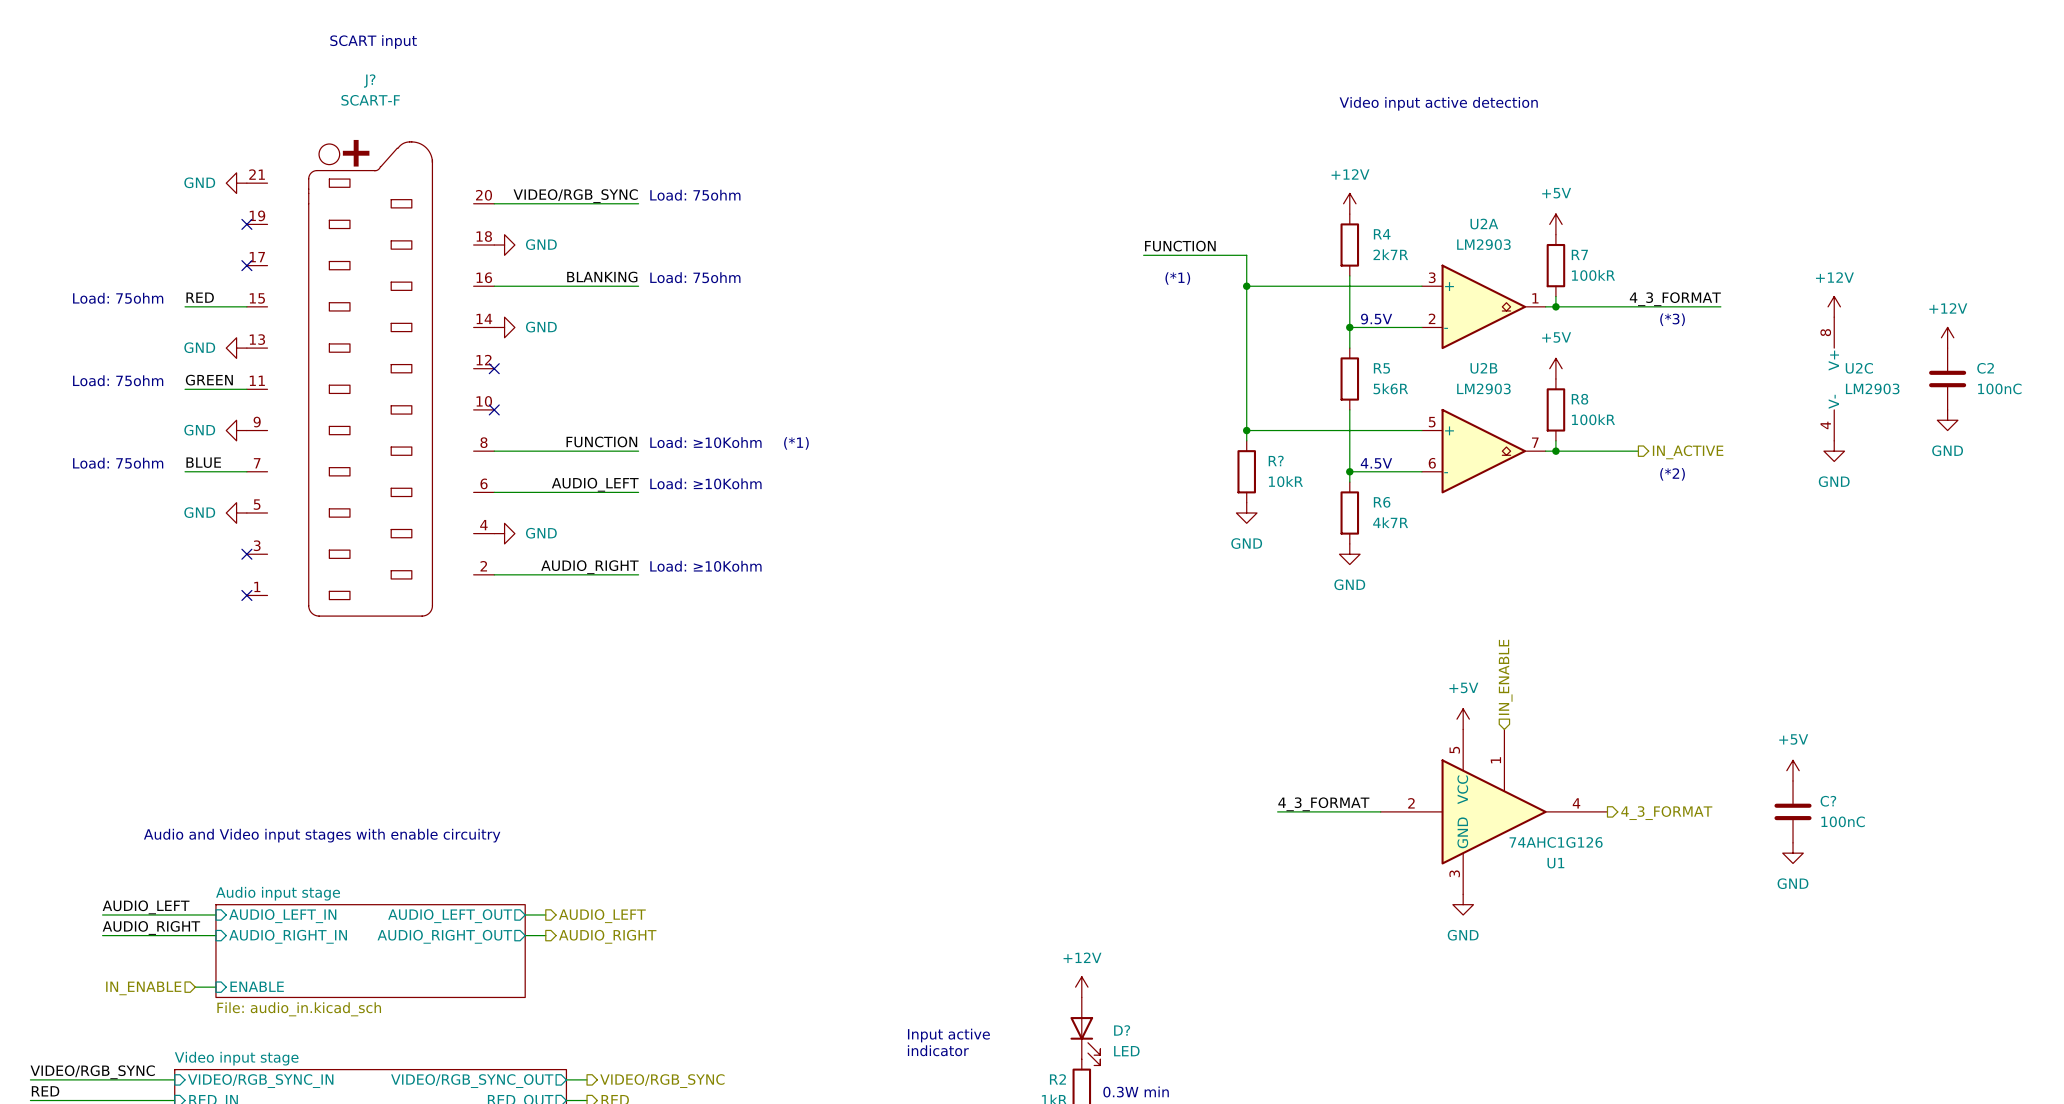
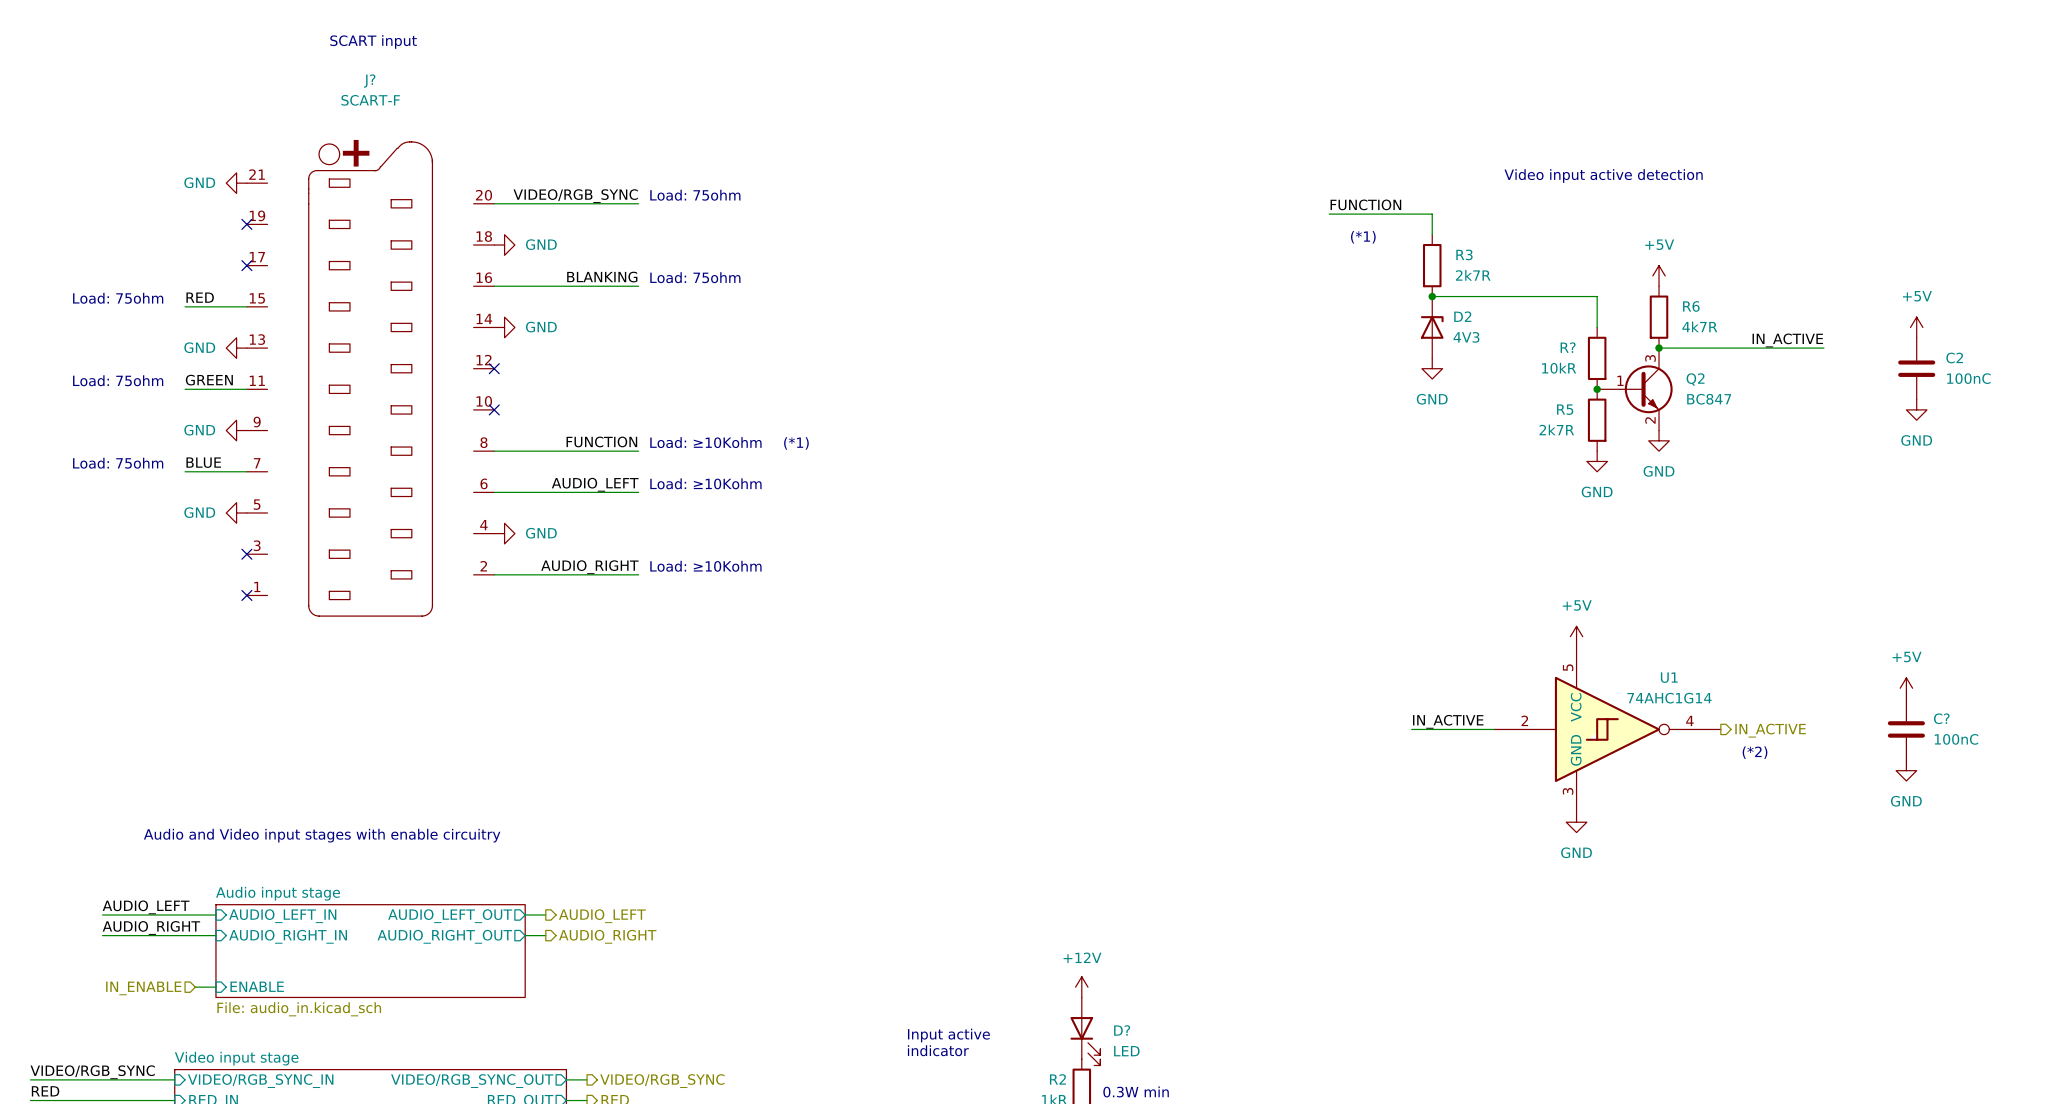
text position: Video input active detection (1438, 103) -> Video input active detection (1603, 175)
power symbol: +12V (1349, 203) -> none
wire: none -> (1329, 214) (1432, 214) (1432, 234)
power symbol: +5V (1555, 224) -> none
R4: 2k7R (1349, 245) -> none
label position: FUNCTION (1180, 246) -> FUNCTION (1365, 204)
wire: (1143, 255) (1246, 255) (1246, 440) -> none
R3: none -> 2k7R (1432, 265)
R7: 100kR (1555, 265) -> none
wire: (1349, 275) (1349, 348) -> none
power symbol: none -> +5V (1659, 275)
text position: (*1) (1177, 278) -> (*1) (1363, 237)
wire: (1246, 286) (1421, 286) -> none
junction: (1246, 286) -> none
wire: none -> (1432, 296) (1597, 296) (1597, 327)
junction: none -> (1432, 296)
wire: (1555, 296) (1555, 306) -> none
label: 4_3_FORMAT (1675, 299) -> none
U2A: LM2903 (1483, 306) -> none
wire: (1545, 306) (1720, 306) -> none
junction: (1555, 306) -> none
power symbol: +12V (1834, 306) -> none
text: 9.5V (1376, 319) -> none
text: (*3) (1672, 319) -> none
wire: (1349, 327) (1421, 327) -> none
junction: (1349, 327) -> none
D2: none -> 4V3 (1432, 327)
power symbol: none -> +5V (1916, 327)
power symbol: +12V (1947, 337) -> none
label: none -> IN_ACTIVE (1787, 340)
wire: none -> (1659, 348) (1823, 348)
junction: none -> (1659, 348)
R?: none -> 10kR (1597, 358)
R5 name position: R5 (1381, 368) -> R5 (1565, 409)
power symbol: none -> GND (1432, 368)
power symbol: +5V (1555, 368) -> none
R5 position: (1349, 379) -> (1597, 420)
U2C: LM2903 (1834, 379) -> none
C2 position: (1947, 379) -> (1916, 368)
R5 value: 5k6R (1390, 388) -> 2k7R (1556, 429)
junction: none -> (1597, 389)
Q2: none -> BC847 (1634, 389)
wire: (1349, 409) (1349, 482) -> none
R8: 100kR (1555, 409) -> none
power symbol position: GND (1947, 420) -> GND (1916, 409)
wire: (1246, 430) (1421, 430) -> none
junction: (1246, 430) -> none
wire: (1555, 440) (1555, 451) -> none
power symbol: none -> GND (1659, 440)
U2B: LM2903 (1483, 451) -> none
wire: (1545, 451) (1638, 451) -> none
junction: (1555, 451) -> none
power symbol: GND (1834, 451) -> none
hierarchical label: IN_ACTIVE (1688, 452) -> none
power symbol: none -> GND (1597, 461)
text: 4.5V (1376, 463) -> none
R?: 10kR (1246, 471) -> none
wire: (1349, 471) (1421, 471) -> none
junction: (1349, 471) -> none
text: (*2) (1672, 474) -> none
power symbol: GND (1246, 513) -> none
R6 position: (1349, 513) -> (1659, 317)
power symbol: GND (1349, 554) -> none
power symbol: none -> +5V (1576, 636)
hierarchical label: IN_ENABLE (1505, 677) -> none
power symbol: none -> +5V (1906, 688)
power symbol: +5V (1463, 719) -> none
label: none -> IN_ACTIVE (1448, 721)
U1 symbol: [1380, 729, 1608, 895] -> [1494, 646, 1721, 812]
wire: none -> (1411, 729) (1494, 729)
hierarchical label: none -> IN_ACTIVE (1770, 730)
text: none -> (*2) (1755, 752)
power symbol: +5V (1793, 770) -> none
power symbol: none -> GND (1906, 770)
label: 4_3_FORMAT (1323, 804) -> none
wire: (1277, 811) (1380, 811) -> none
C? position: (1793, 811) -> (1906, 729)
hierarchical label: 4_3_FORMAT (1666, 813) -> none
power symbol: none -> GND (1576, 822)
U1 value: 74AHC1G126 (1556, 842) -> 74AHC1G14 (1669, 698)
power symbol: GND (1793, 853) -> none
U1 name position: U1 (1555, 863) -> U1 (1669, 677)
power symbol: GND (1463, 904) -> none

